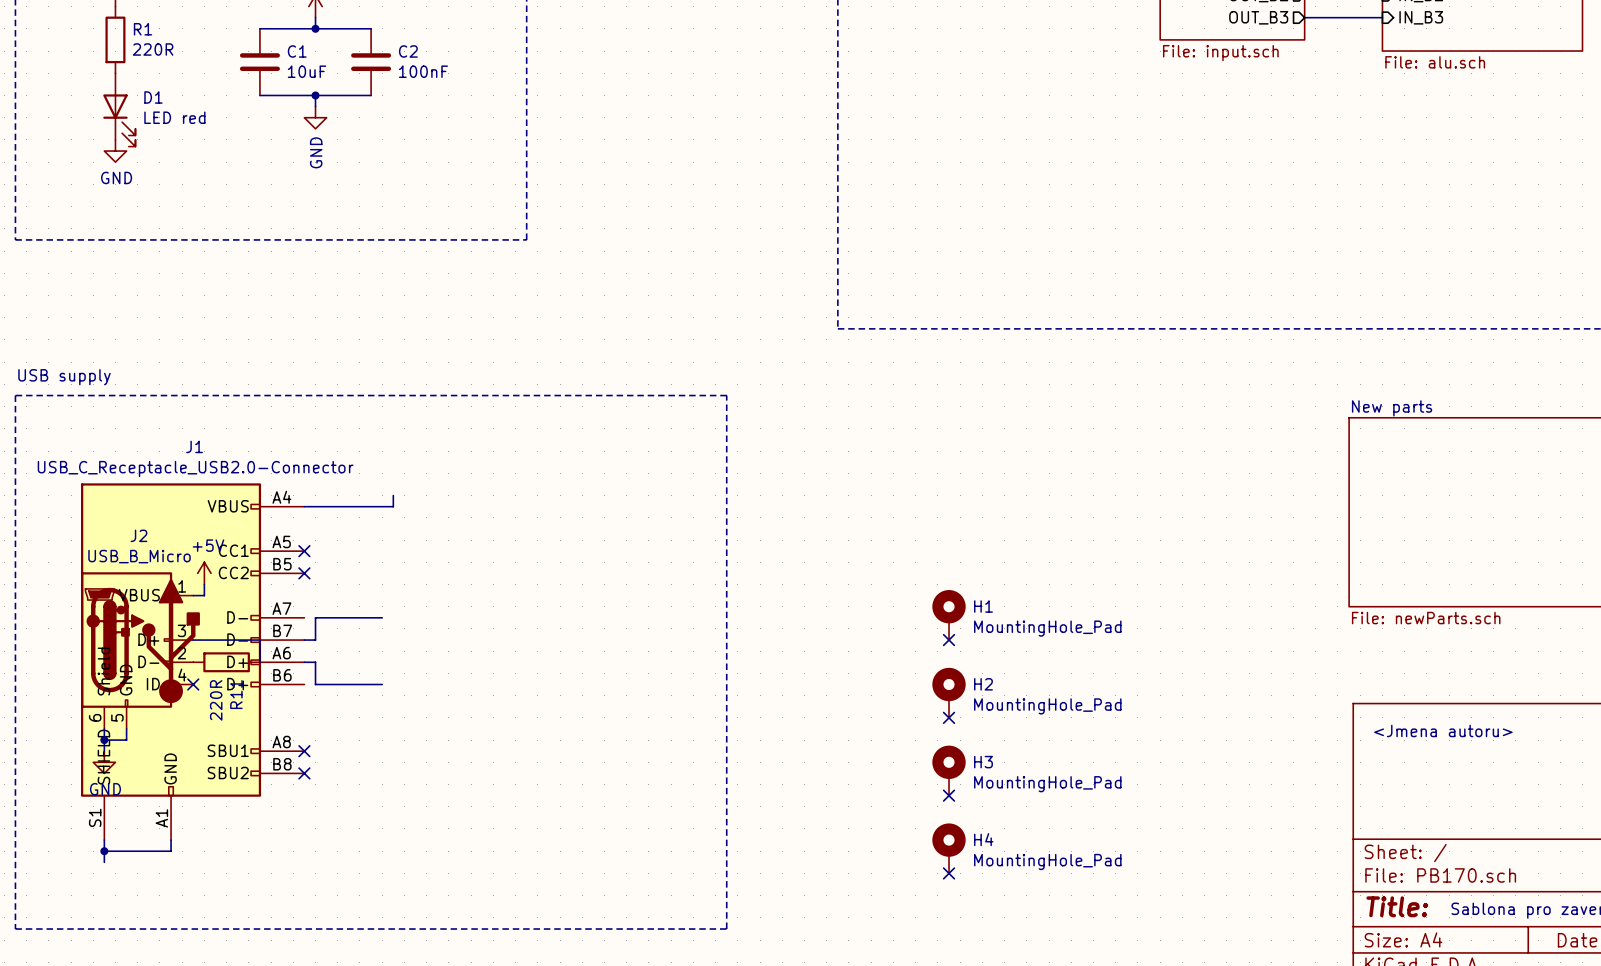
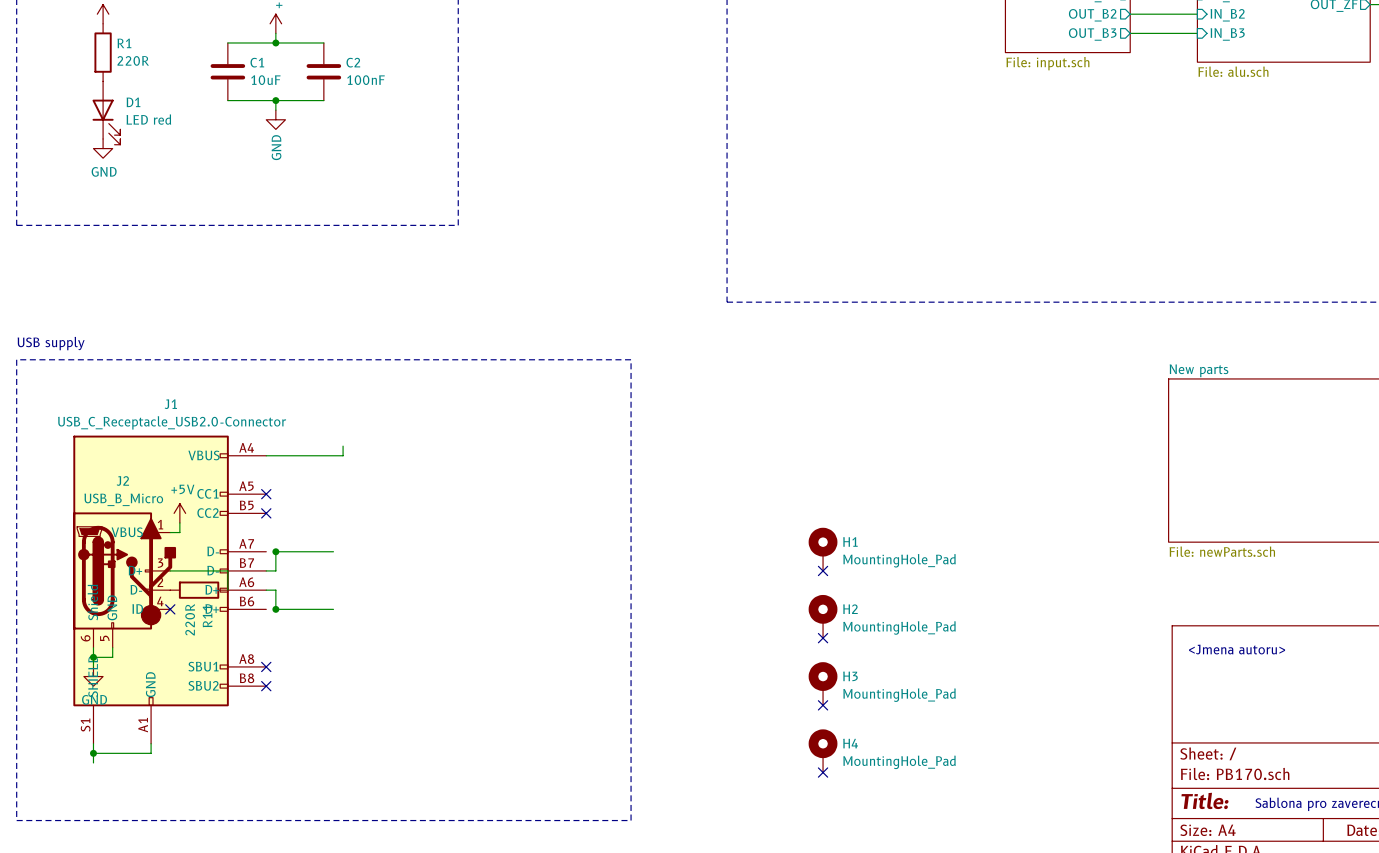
junction: none -> (275, 551)
junction: none -> (275, 609)

